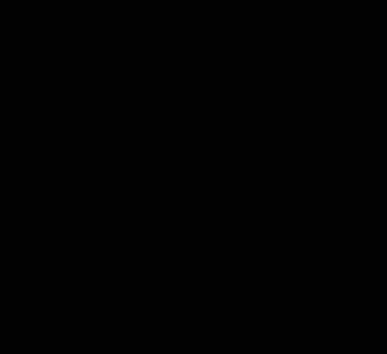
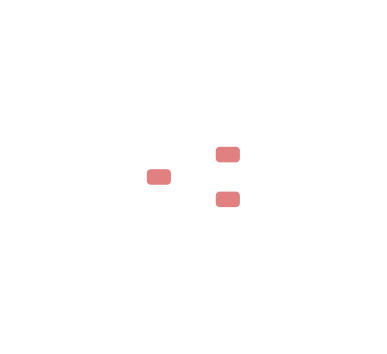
part: none -> (193, 176)

